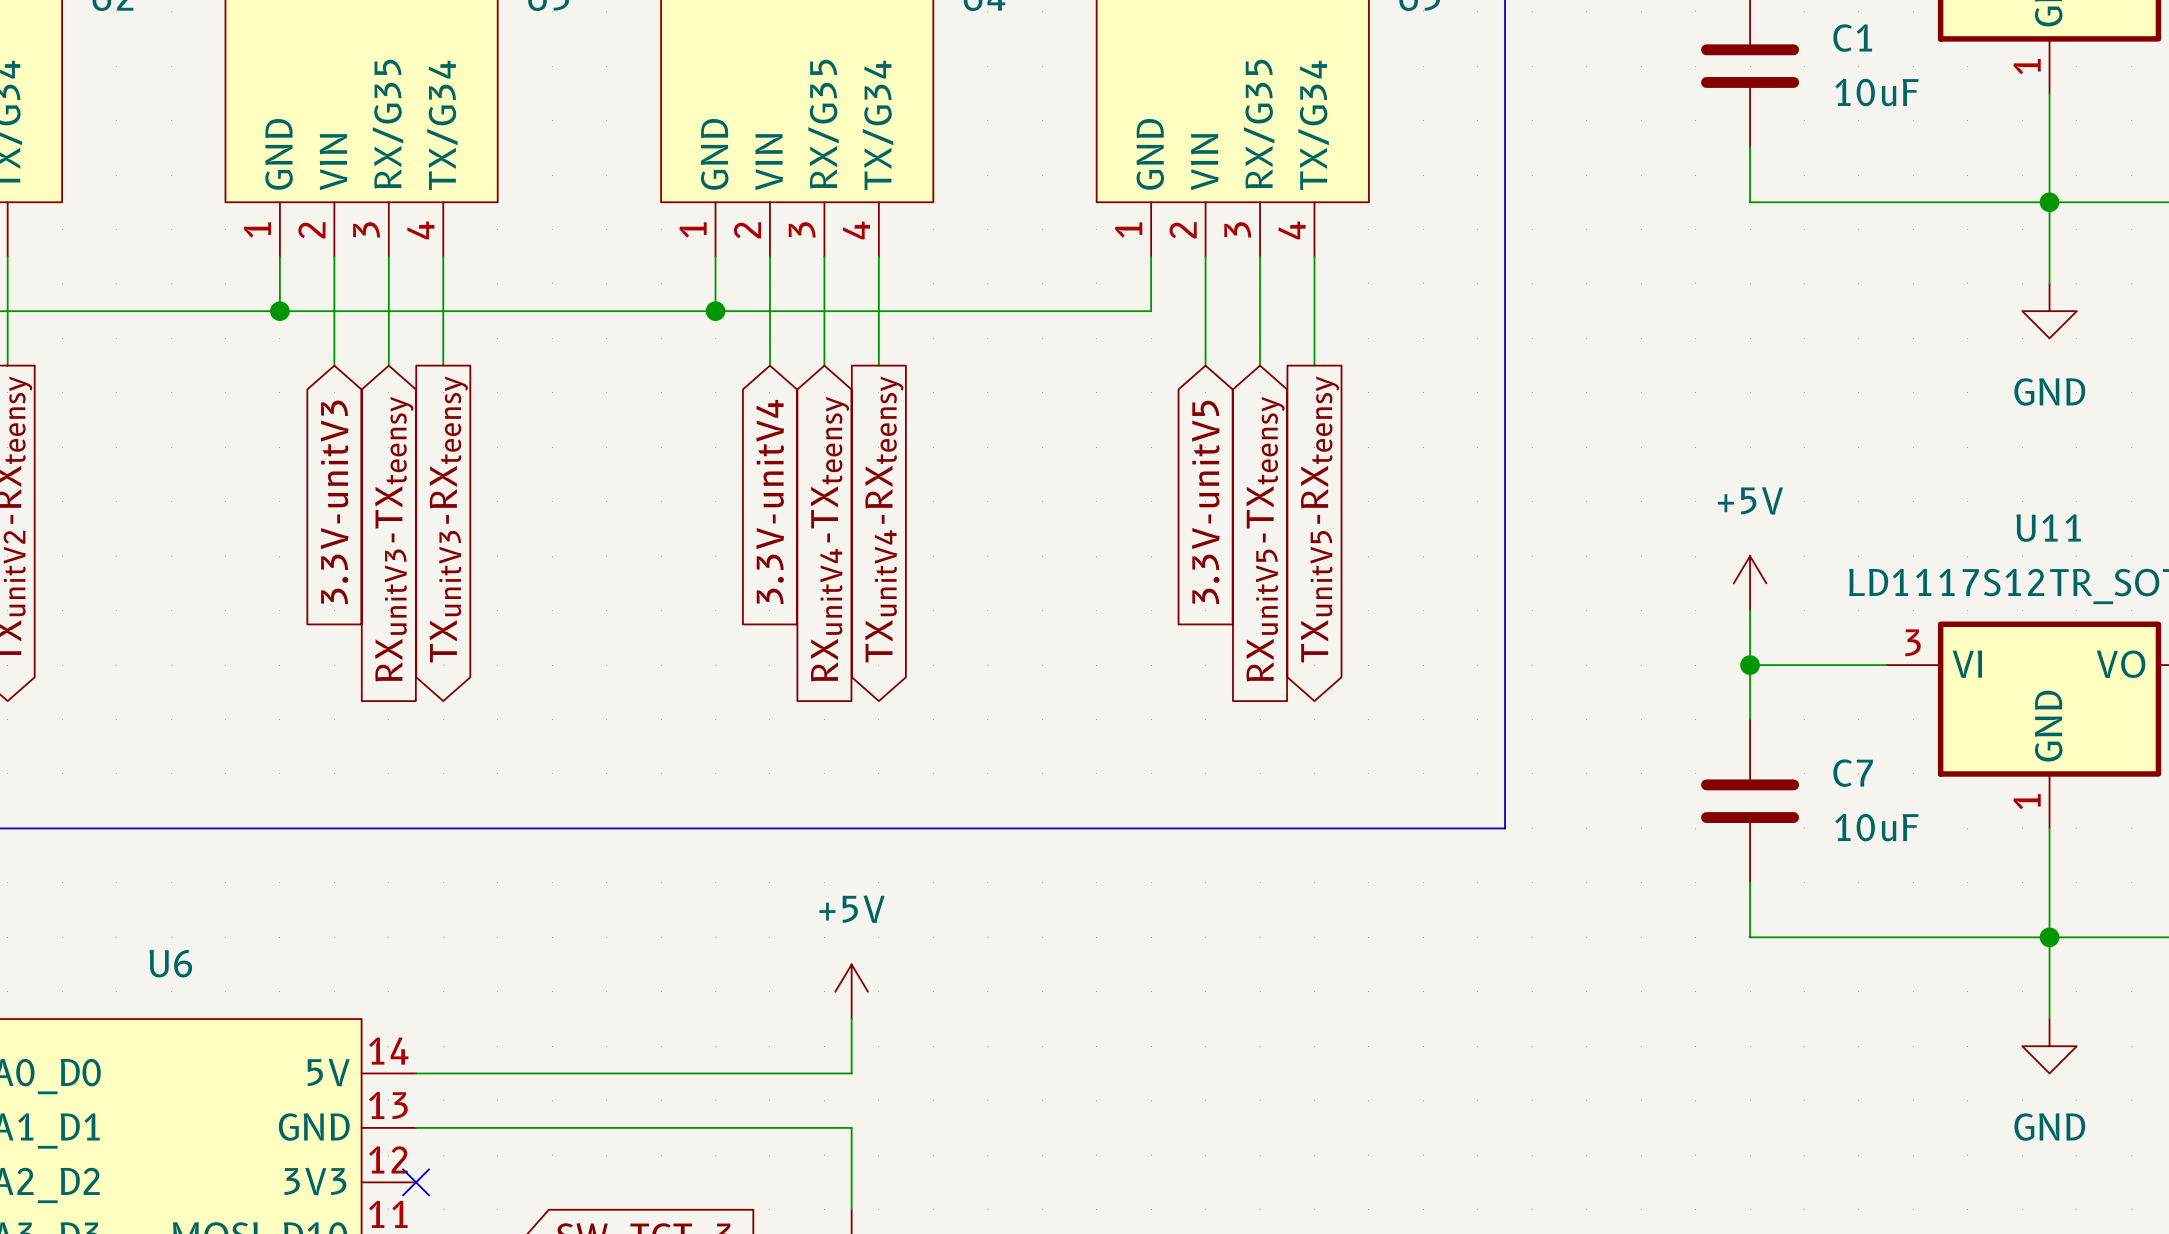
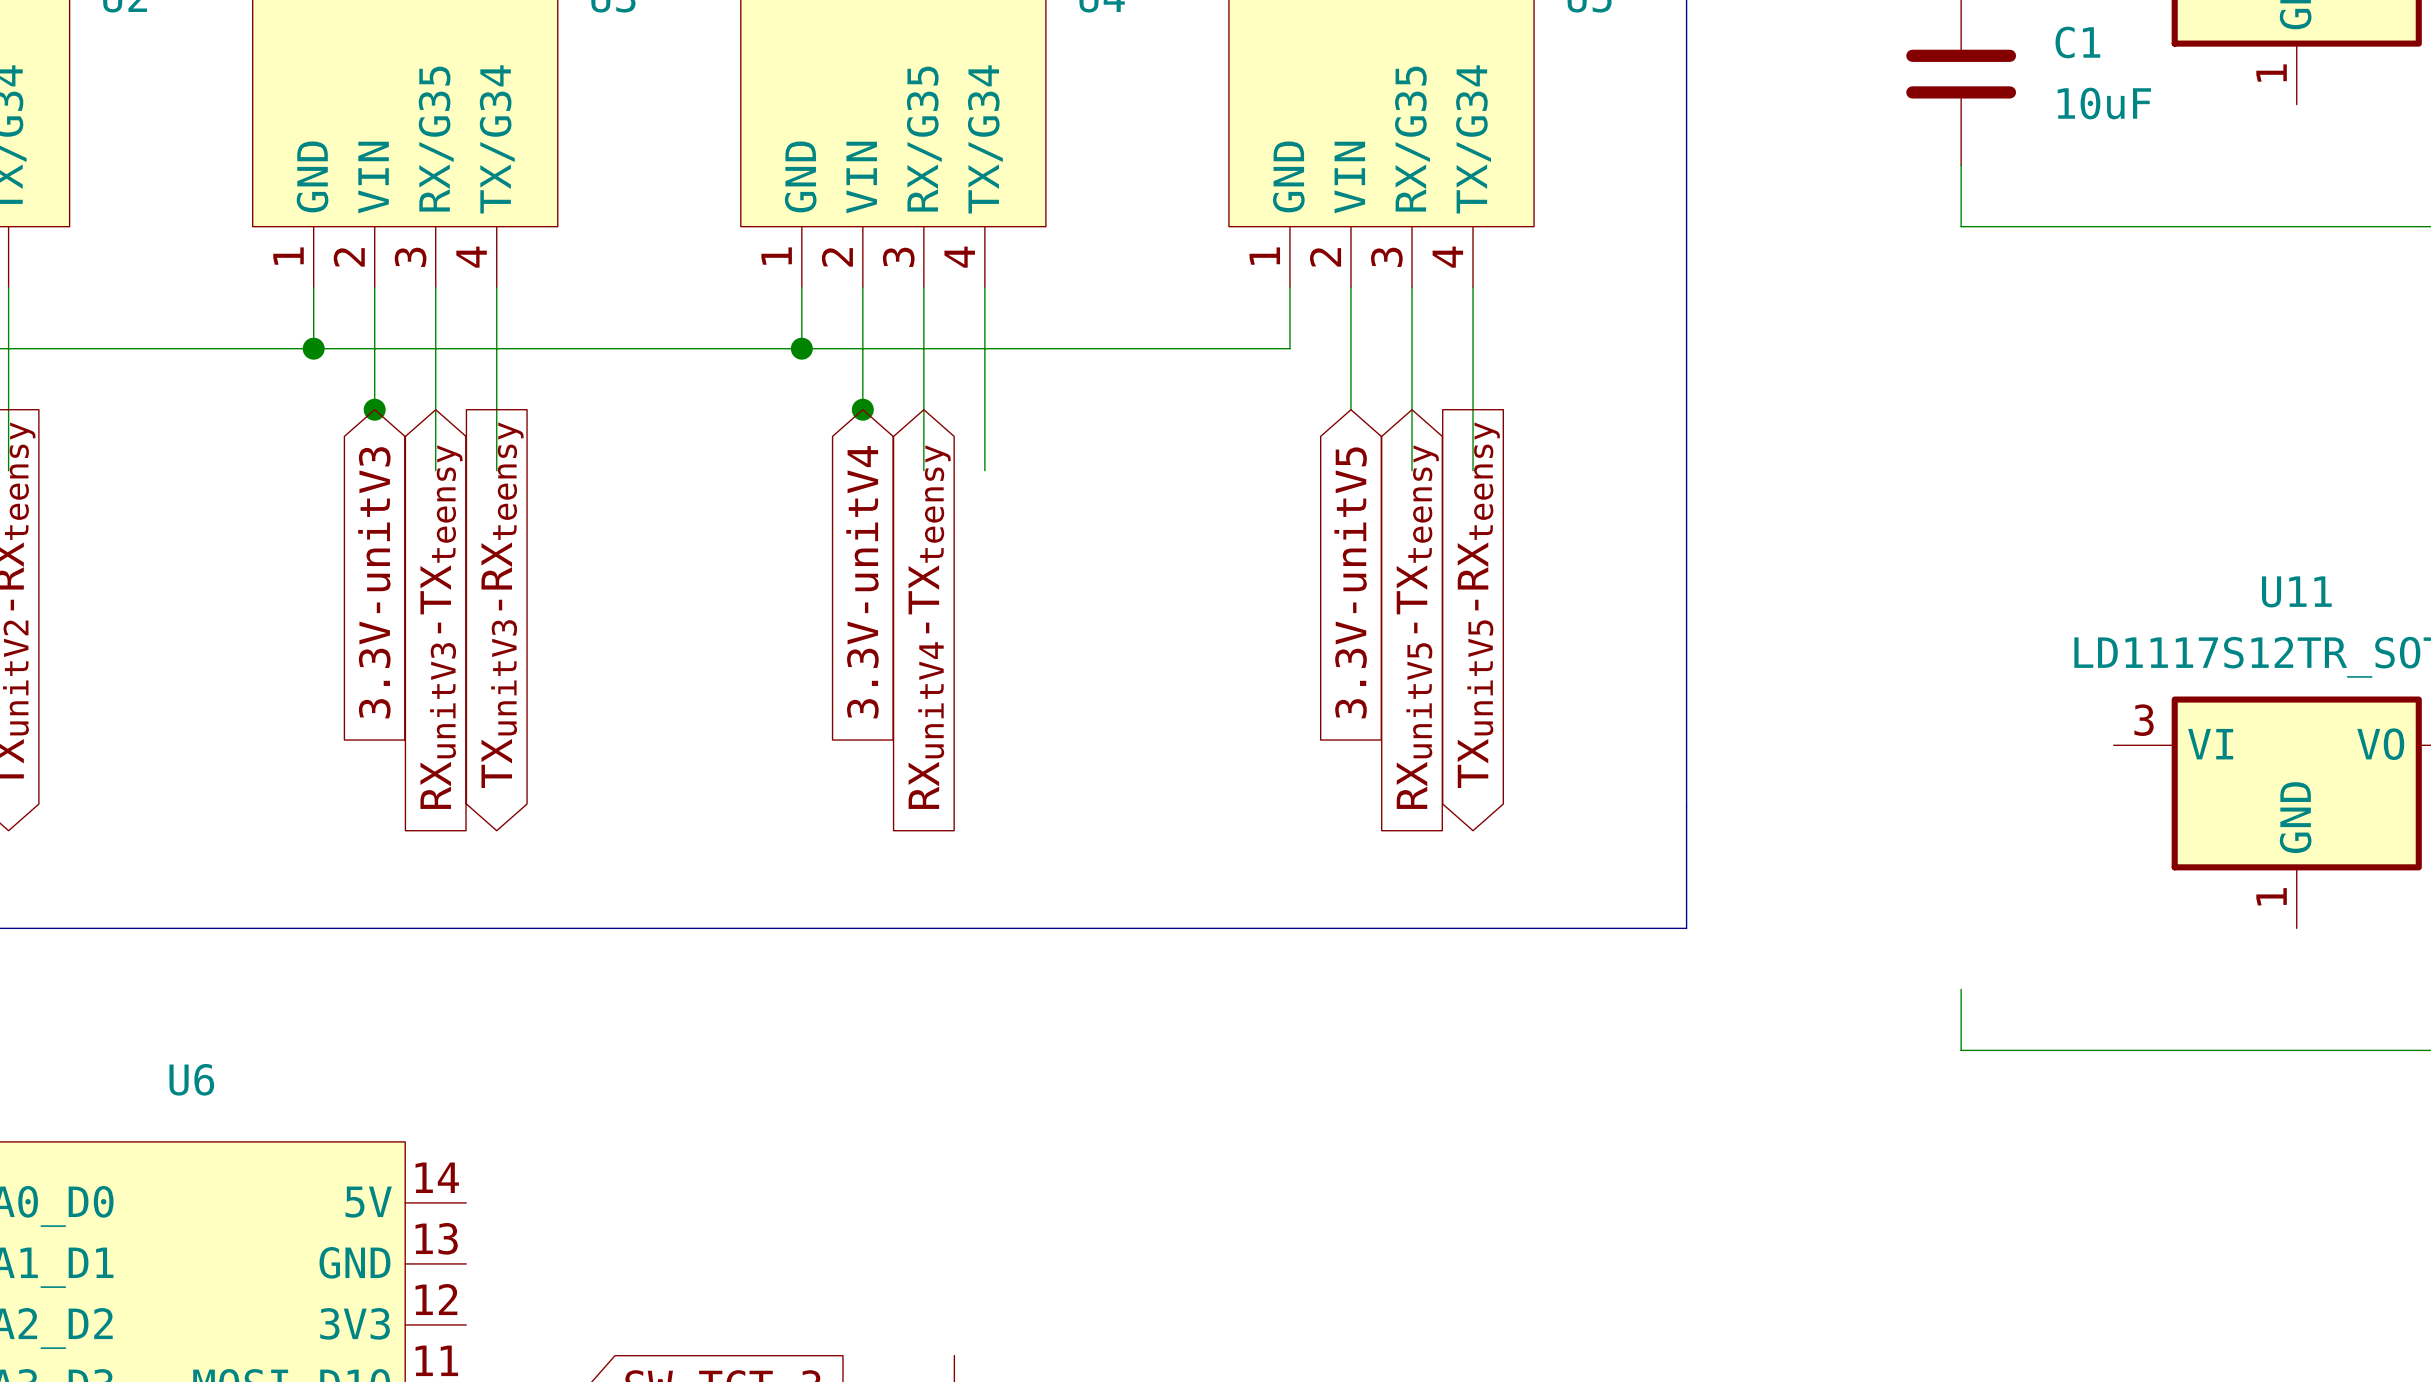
wire: (2049, 93) (2049, 283) -> none
junction: (2049, 202) -> none
power symbol: GND (2049, 311) -> none
wire: none -> (8, 409) (8, 470)
junction: none -> (374, 409)
wire: none -> (435, 409) (435, 470)
wire: none -> (496, 409) (496, 470)
junction: none -> (862, 409)
wire: none -> (923, 409) (923, 470)
wire: none -> (984, 409) (984, 470)
wire: none -> (1412, 409) (1412, 470)
wire: none -> (1473, 409) (1473, 470)
global label: TXunitV4-RXteensy (884, 519) -> none
power symbol: +5V (1750, 583) -> none
wire: (1750, 610) (1750, 719) -> none
wire: (1750, 665) (1886, 665) -> none
junction: (1750, 665) -> none
C7: 10uF (1750, 801) -> none
wire: (2049, 828) (2049, 1019) -> none
junction: (2049, 937) -> none
power symbol: +5V (851, 991) -> none
wire: (851, 1019) (851, 1073) (416, 1073) -> none
power symbol: GND (2049, 1046) -> none
wire: (416, 1127) (851, 1127) (851, 1209) -> none
no-connect mark: (416, 1182) -> none

